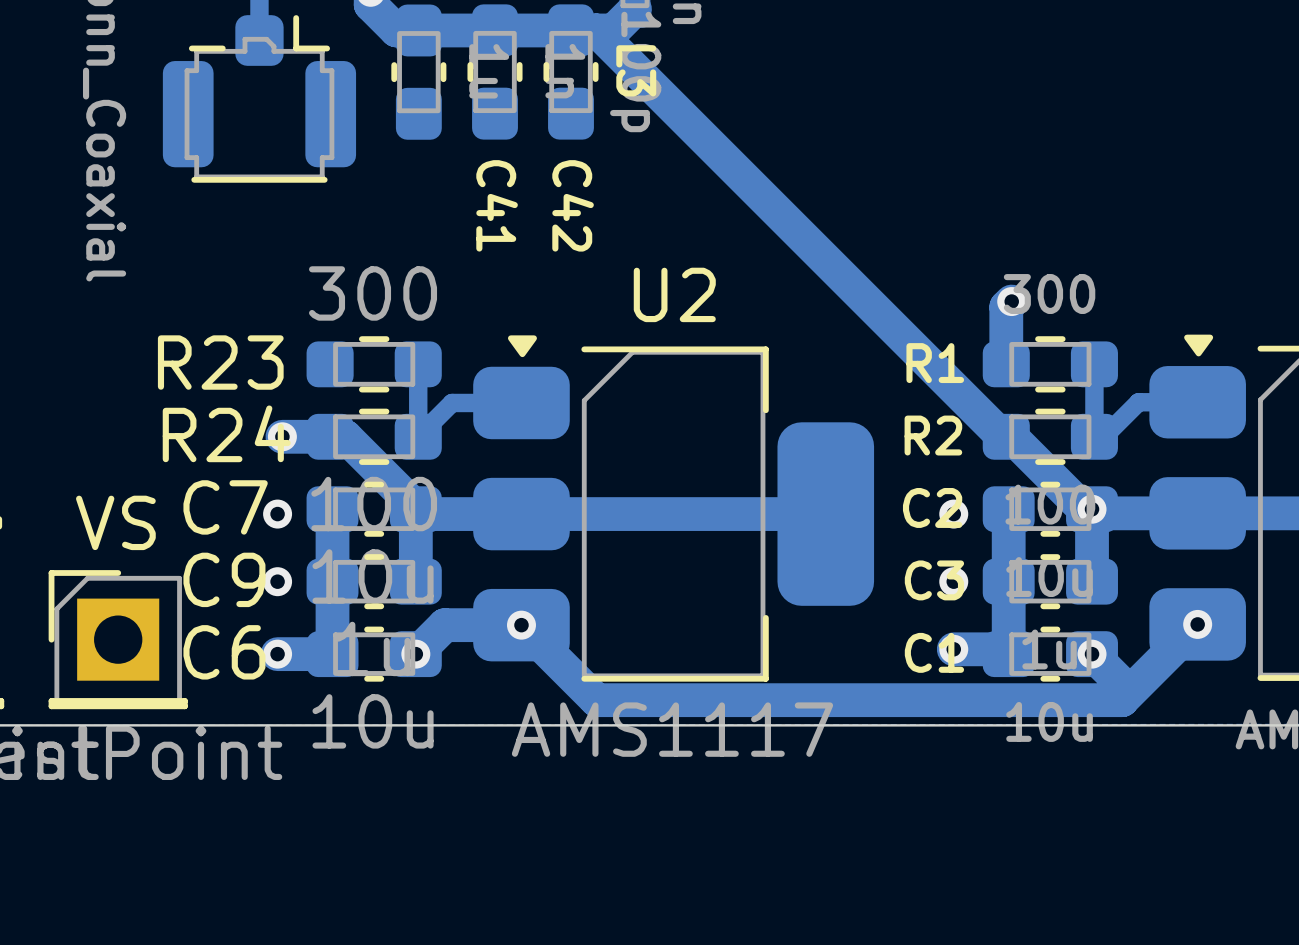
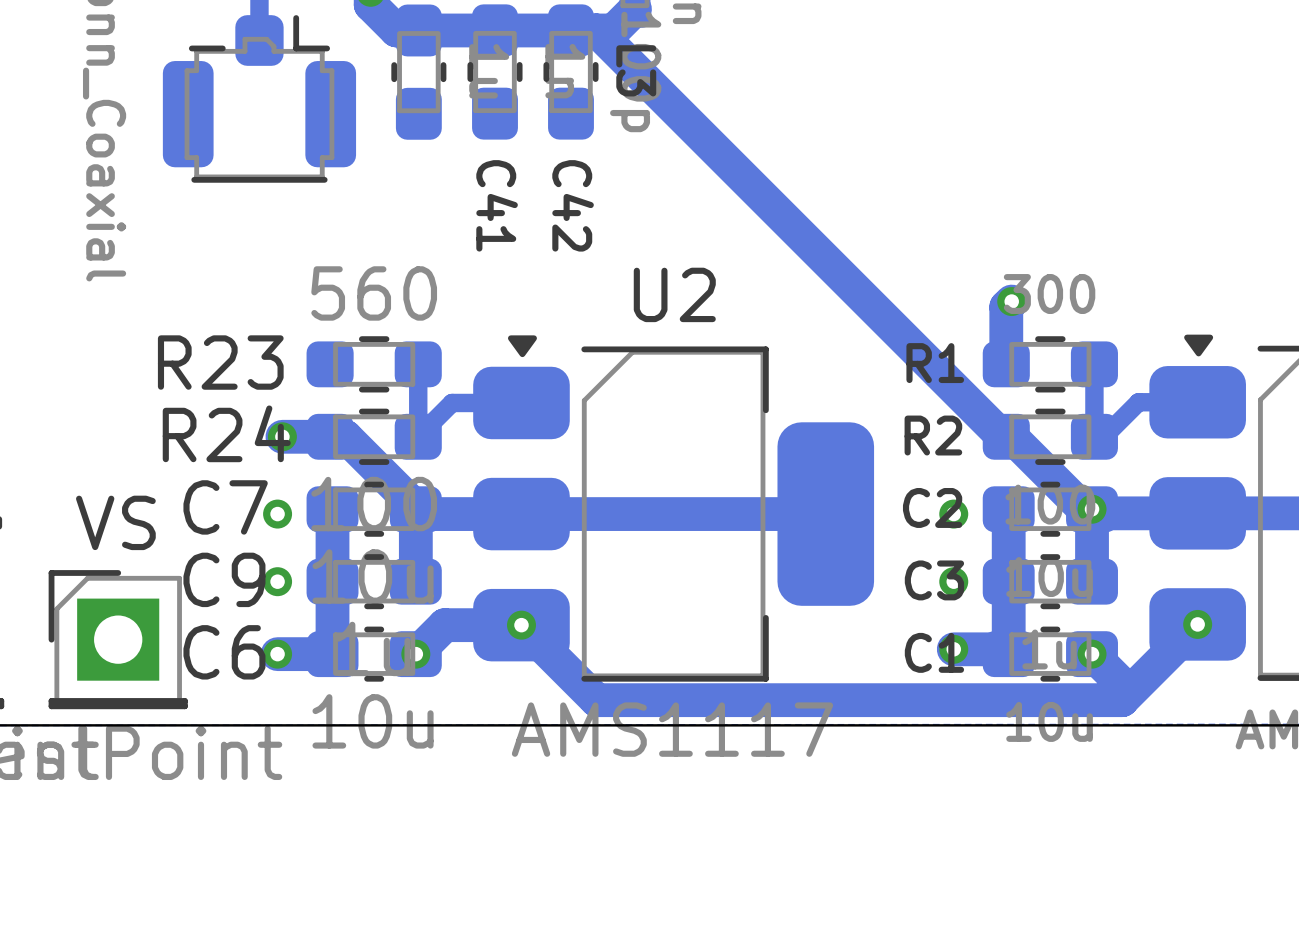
R23 value: 300 (373, 293) -> 560 (374, 293)

